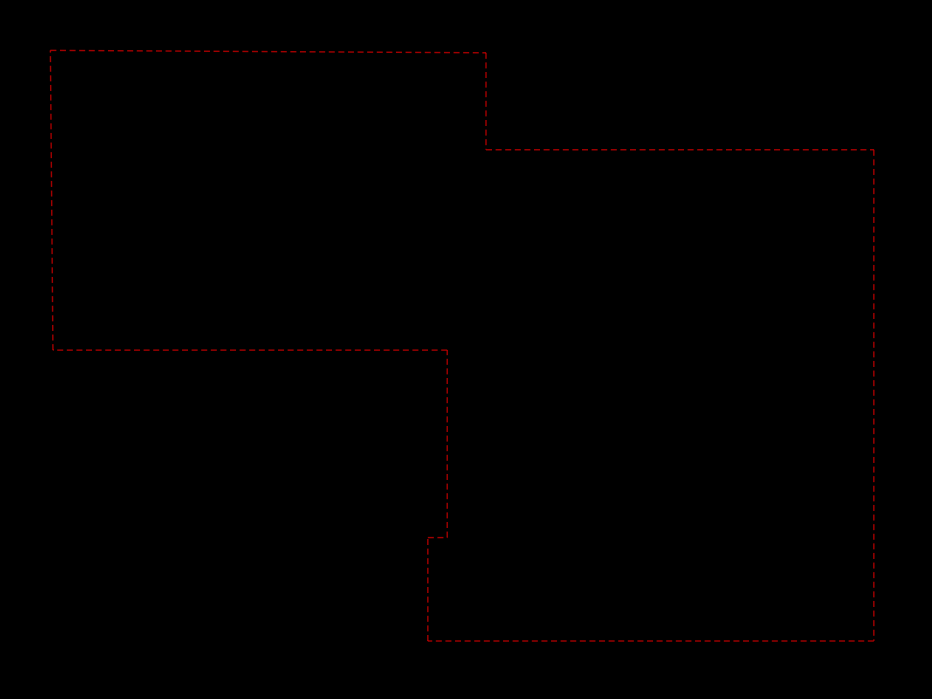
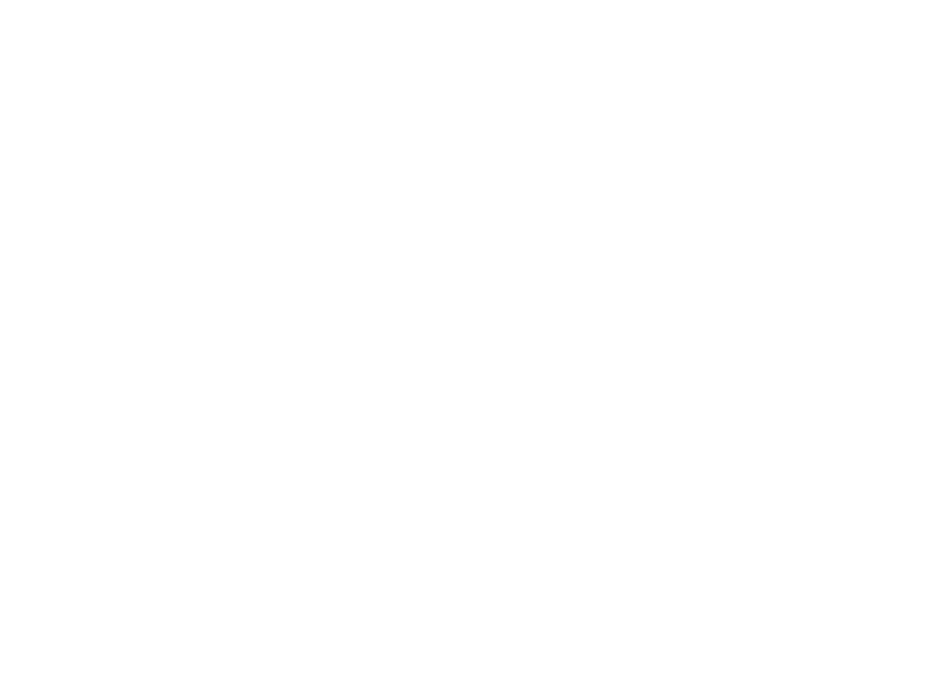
zone outline: (50, 50) (52, 350) (447, 350) (447, 537) (427, 537) (427, 641) (873, 641) (873, 149) (486, 149) (486, 52) (50, 50) -> none

